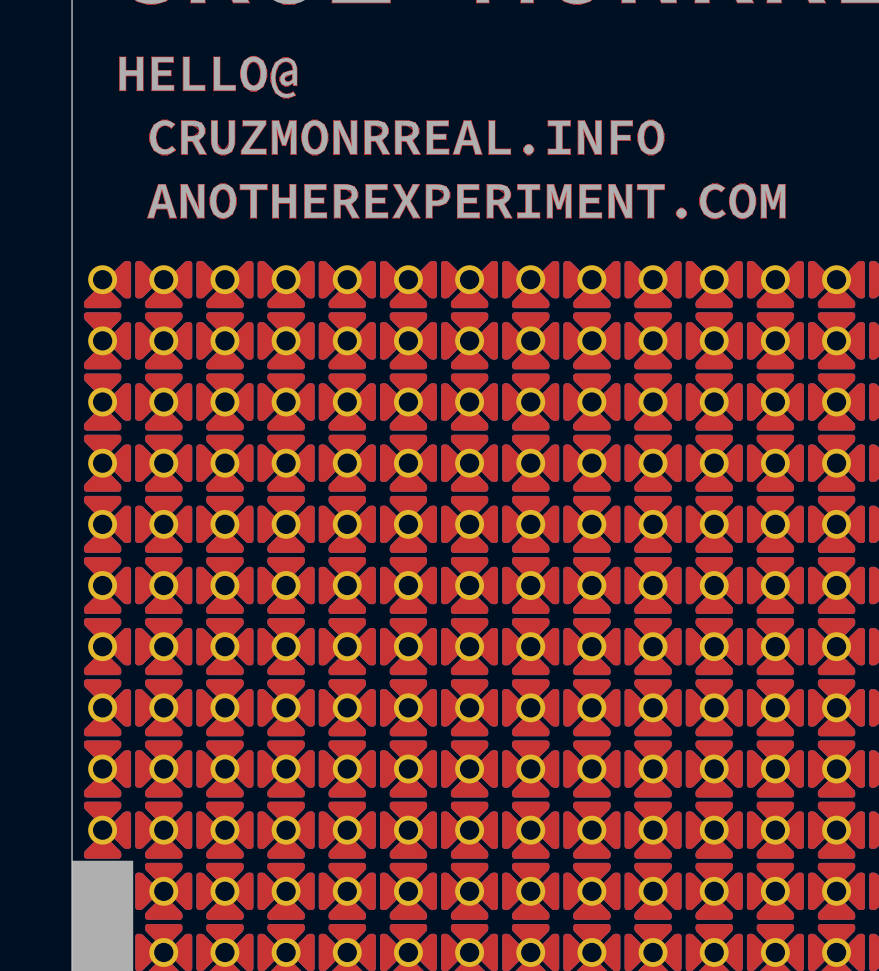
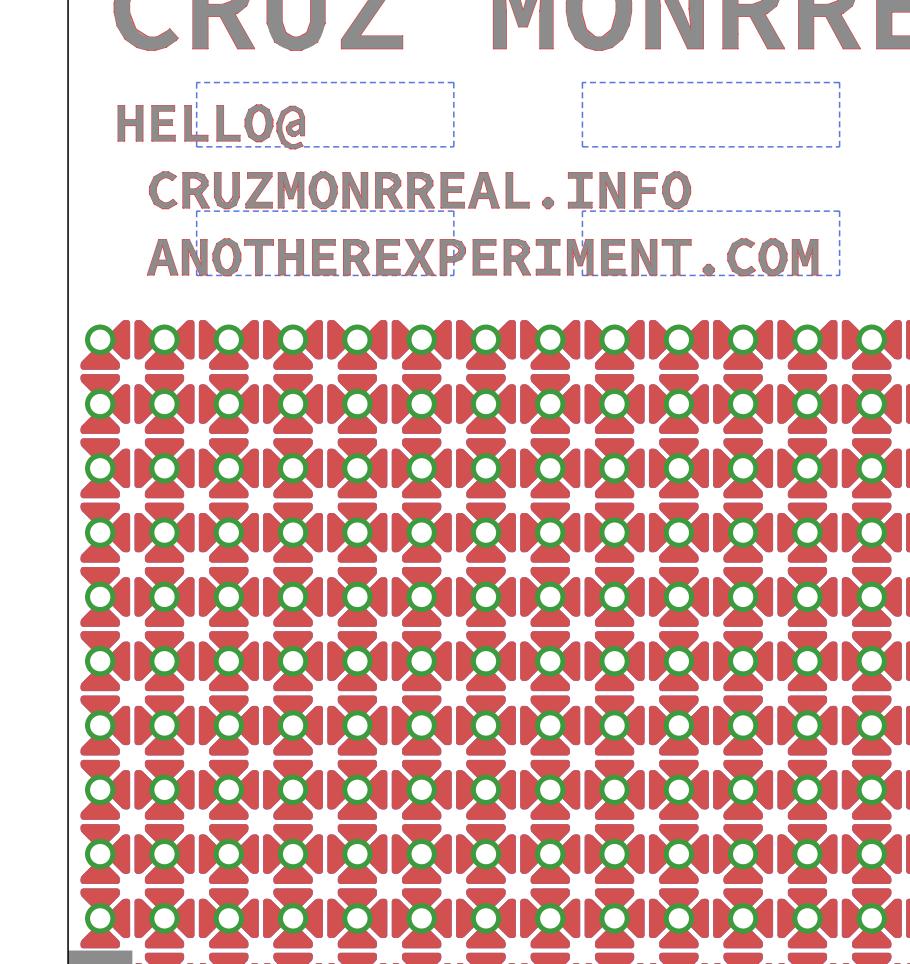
bottom zone outline: none -> (196, 82) (196, 146) (453, 146) (453, 82) (196, 82)
bottom zone outline: none -> (582, 82) (839, 82) (839, 146) (582, 146) (582, 82)
bottom zone outline: none -> (196, 211) (196, 275) (453, 275) (453, 211) (196, 211)
bottom zone outline: none -> (582, 211) (839, 211) (839, 275) (582, 275) (582, 211)

